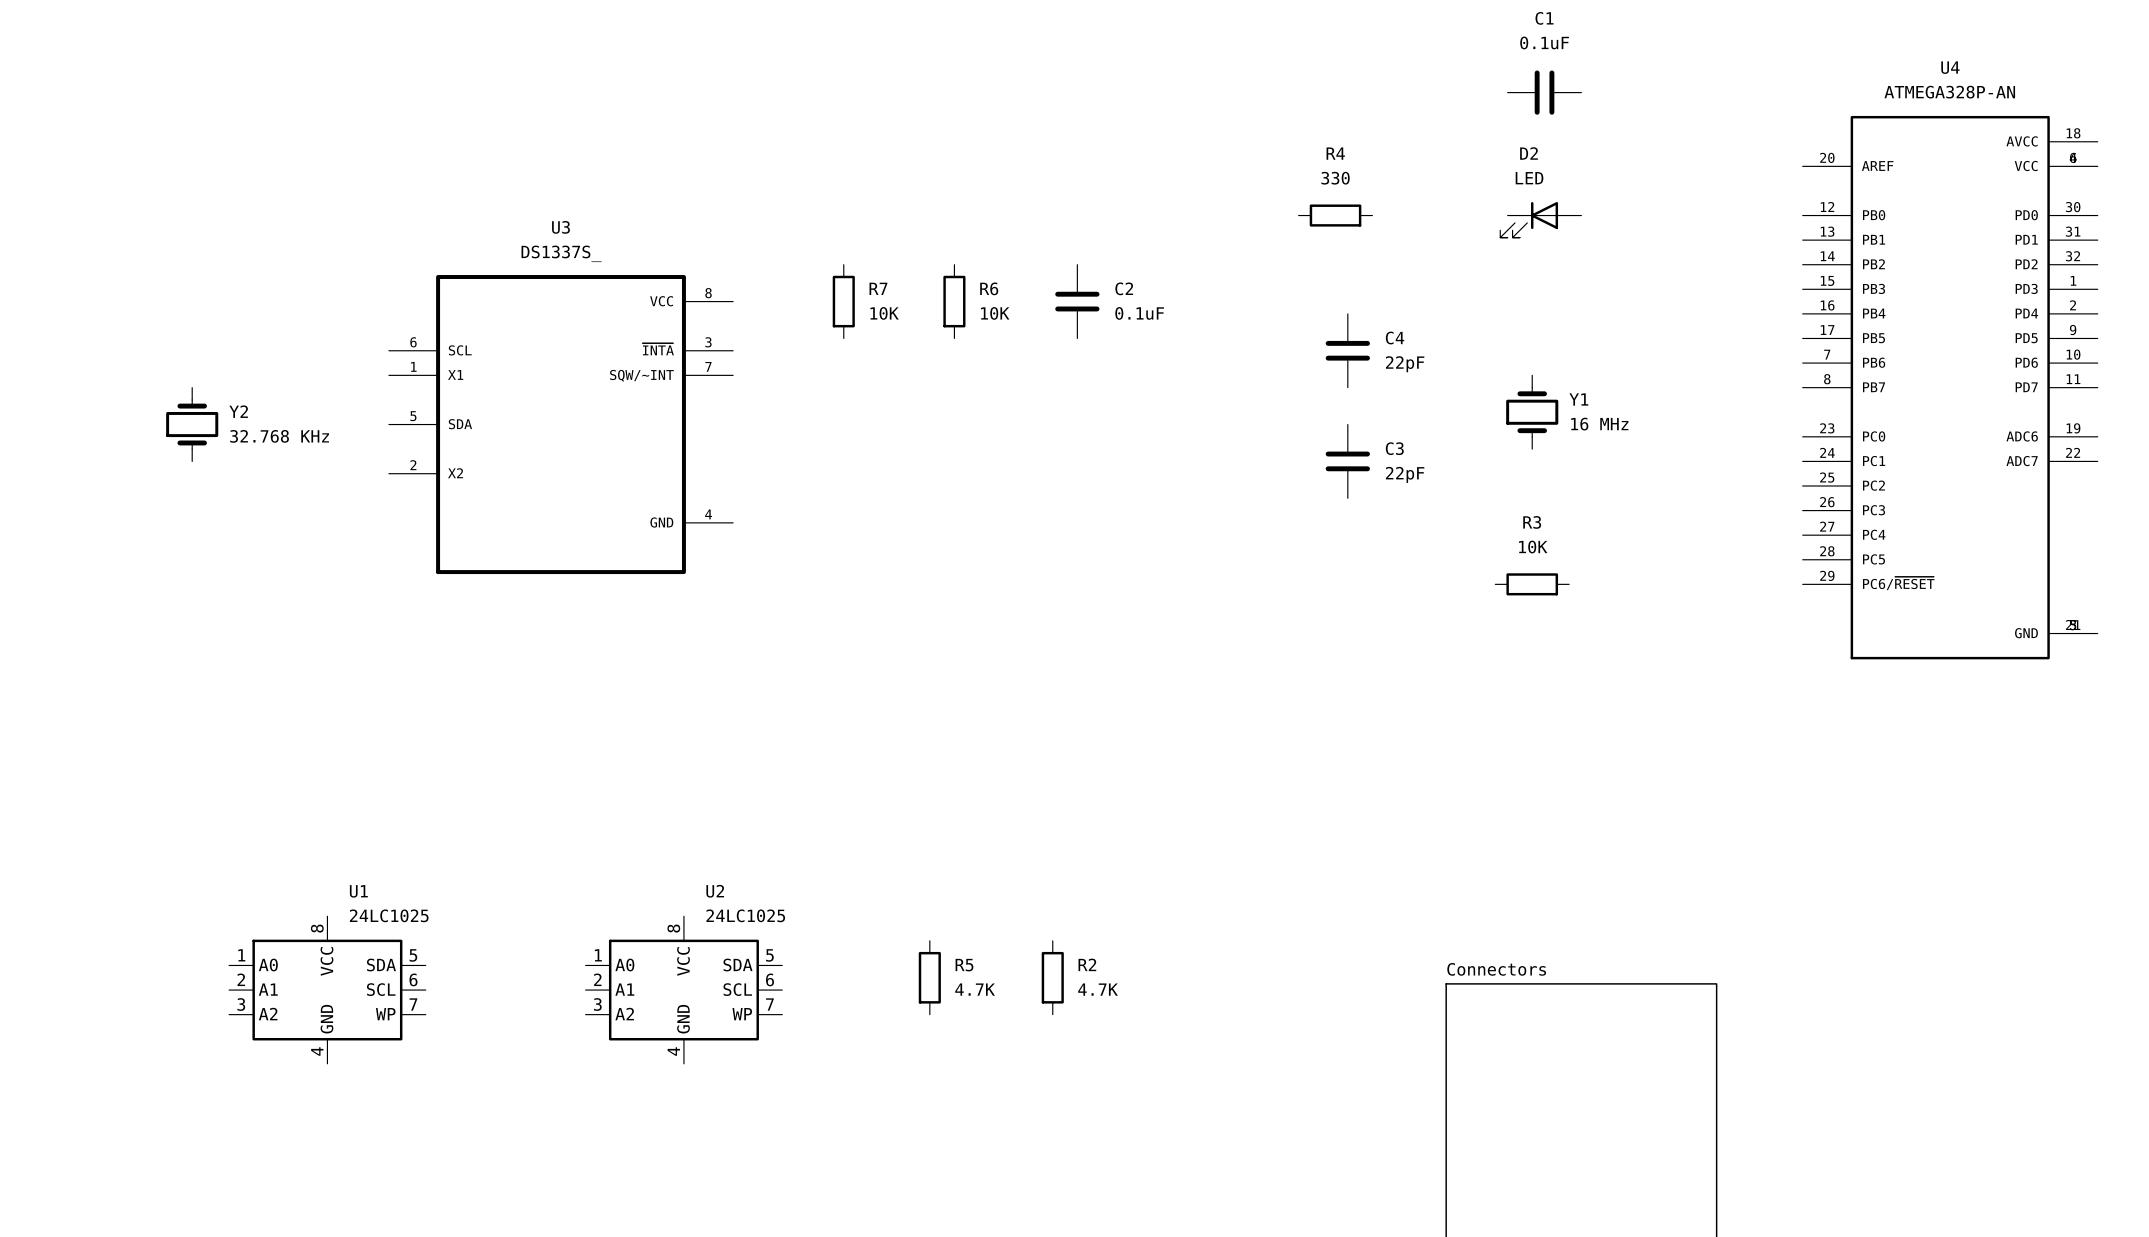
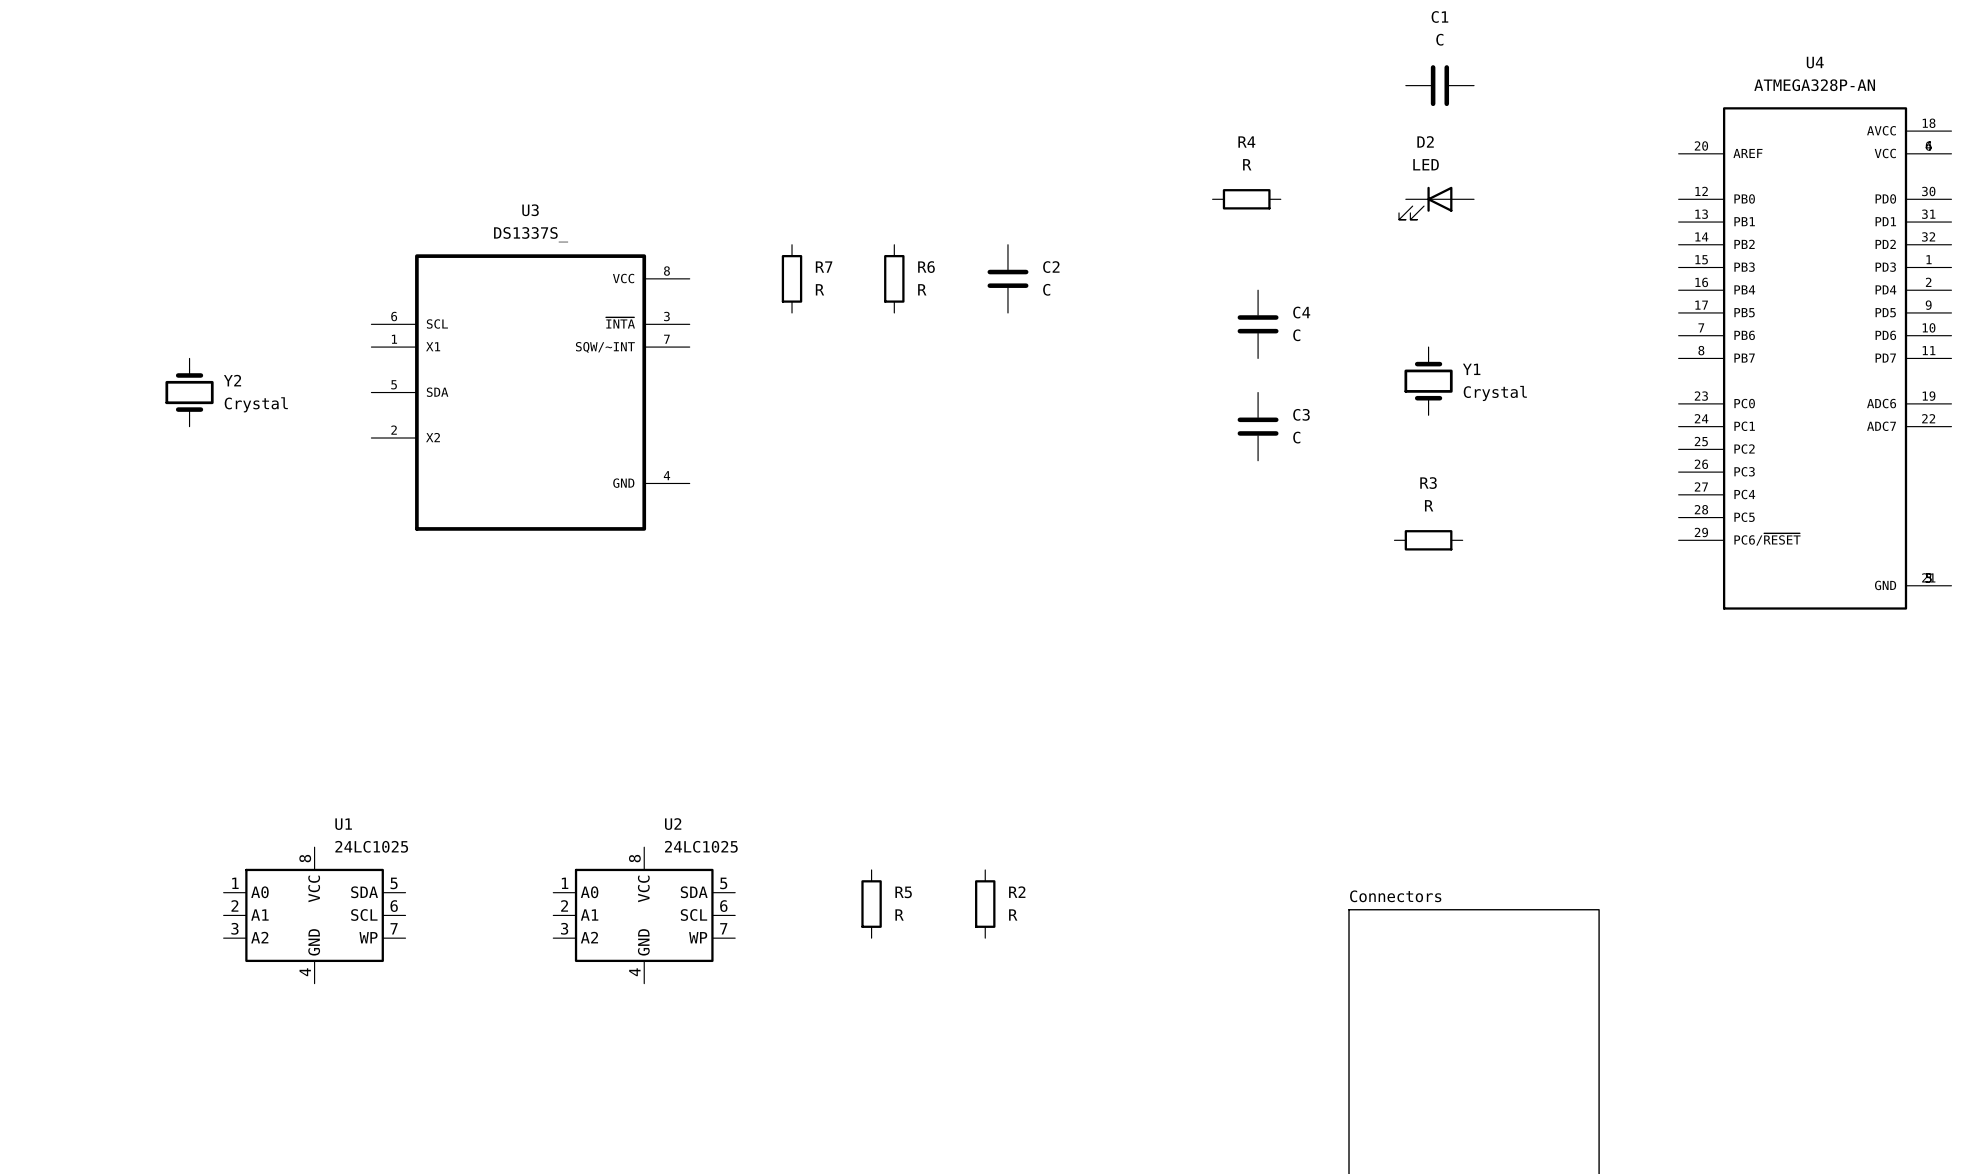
C1 value: 0.1uF (1544, 42) -> C (1439, 39)
R4 value: 330 (1335, 178) -> R (1247, 164)
R7 value: 10K (884, 313) -> R (819, 289)
R6 value: 10K (995, 313) -> R (922, 289)
C2 value: 0.1uF (1139, 313) -> C (1046, 289)
C4 value: 22pF (1405, 364) -> C (1296, 335)
Y1 value: 16 MHz (1599, 424) -> Crystal (1495, 393)
Y2 value: 32.768 KHz (279, 436) -> Crystal (256, 404)
C3 value: 22pF (1405, 474) -> C (1296, 437)
R3 value: 10K (1533, 547) -> R (1429, 505)
R5 value: 4.7K (975, 989) -> R (899, 914)
R2 value: 4.7K (1098, 989) -> R (1013, 914)

